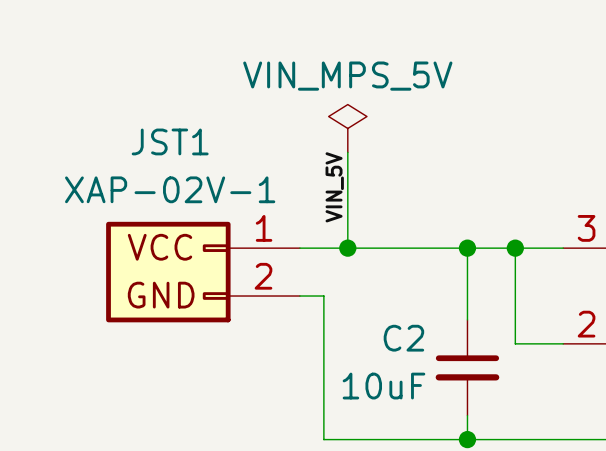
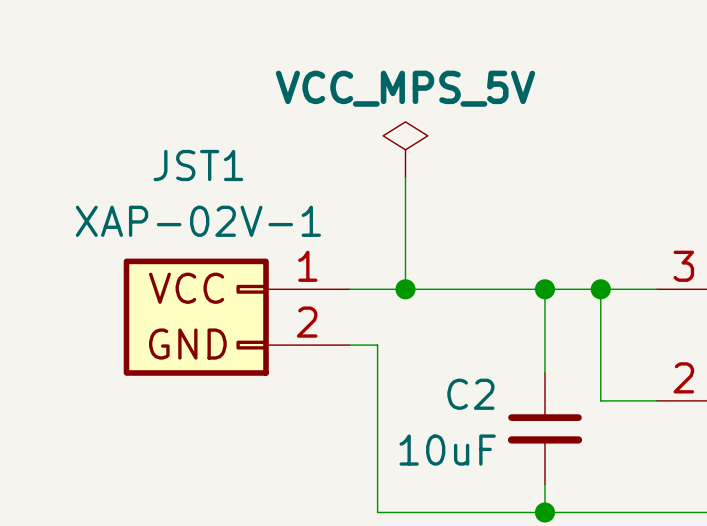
power symbol: VIN_MPS_5V (347, 128) -> VCC_MPS_5V (405, 149)
label: VIN_5V (334, 187) -> none

